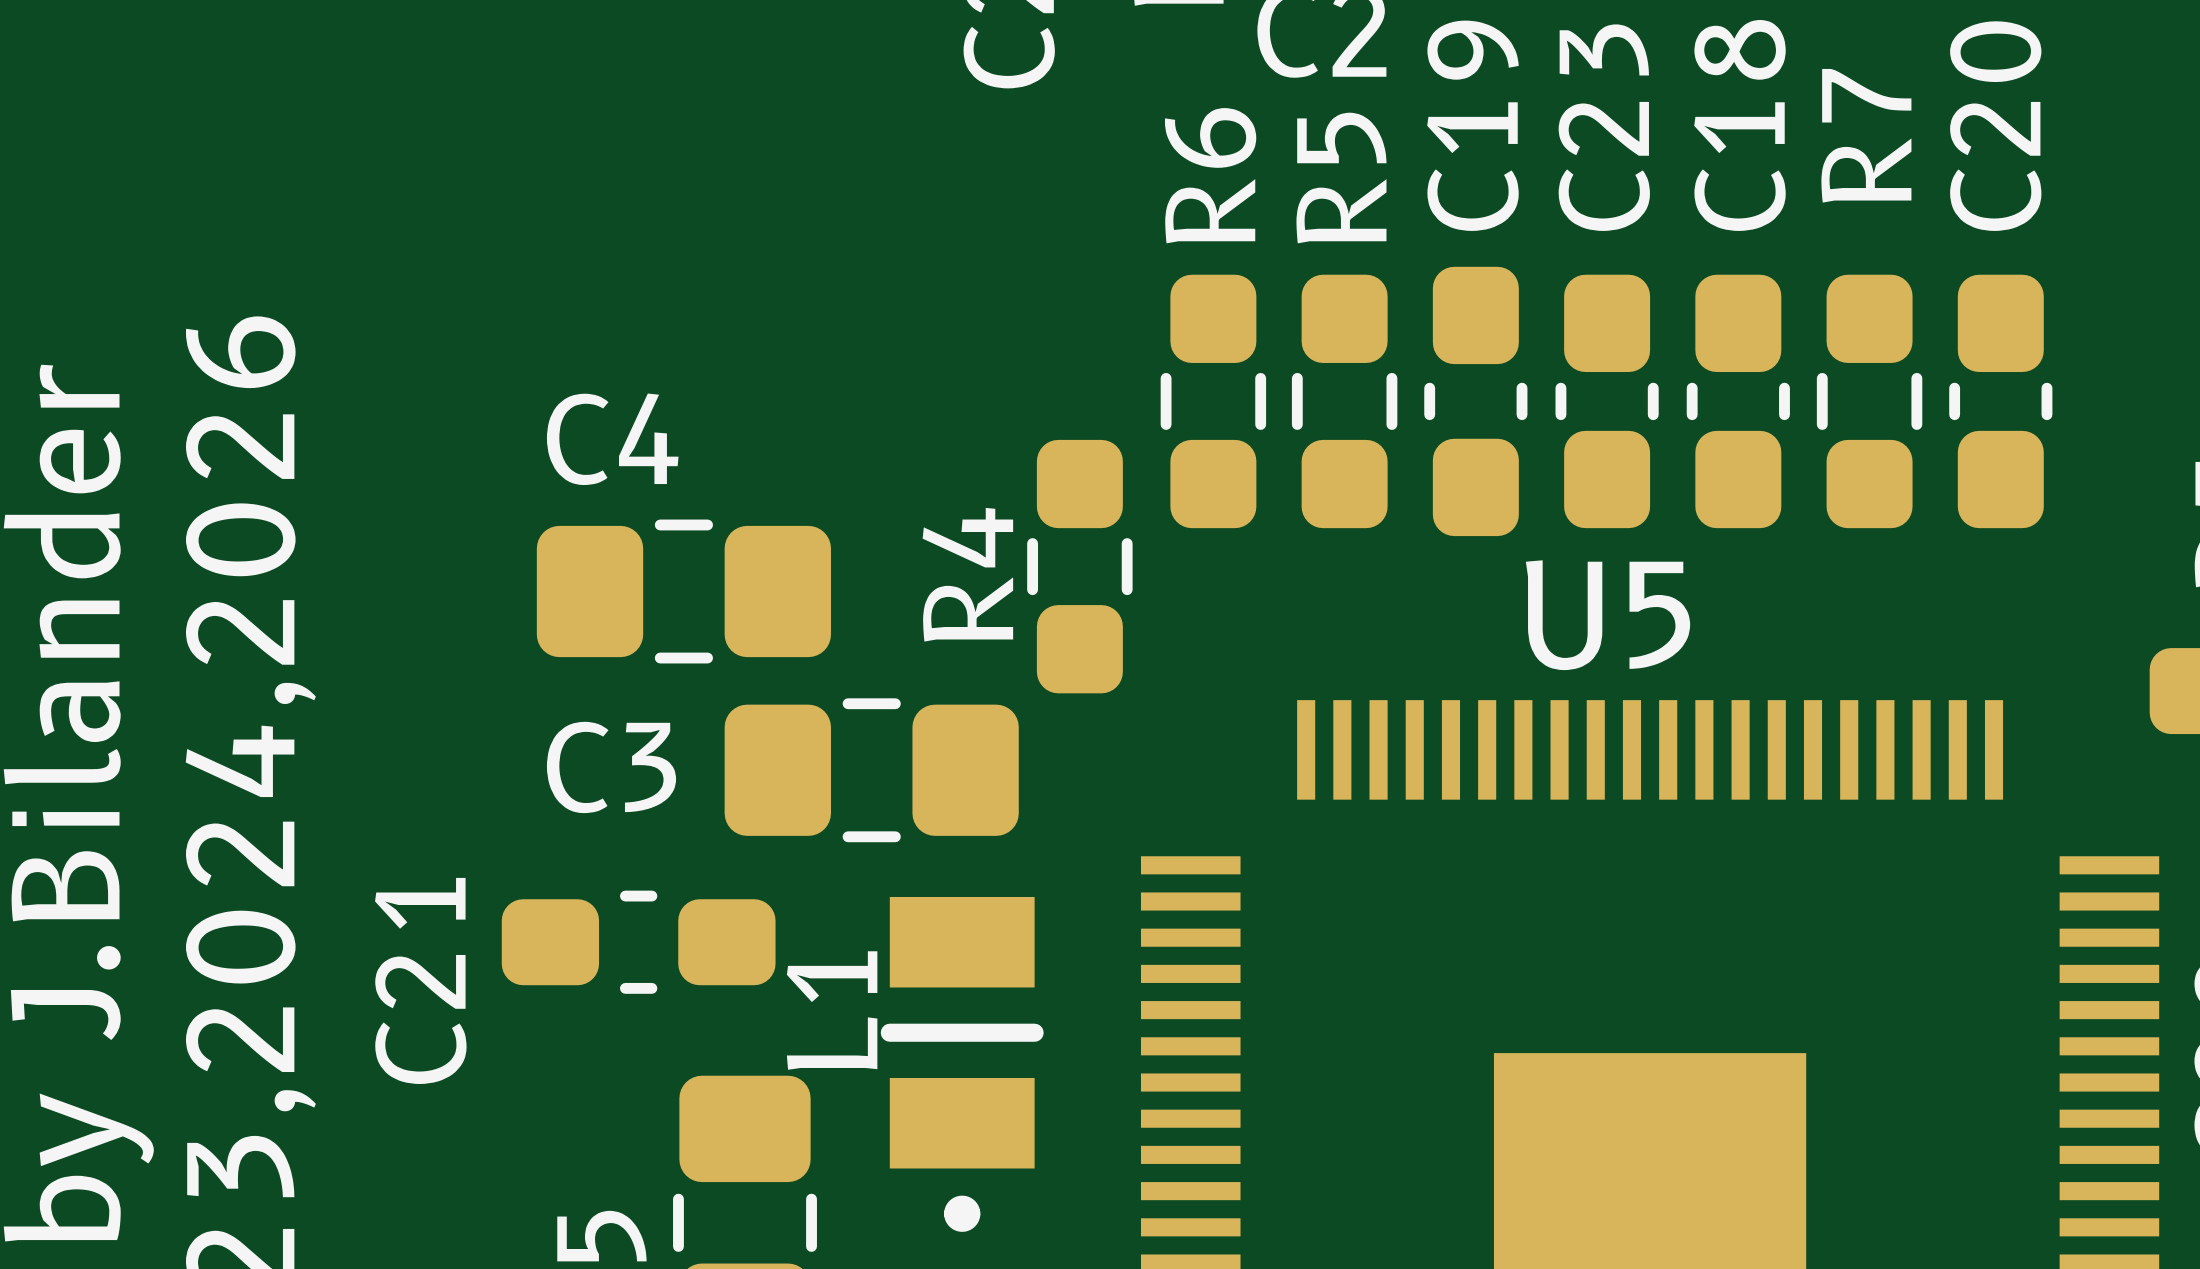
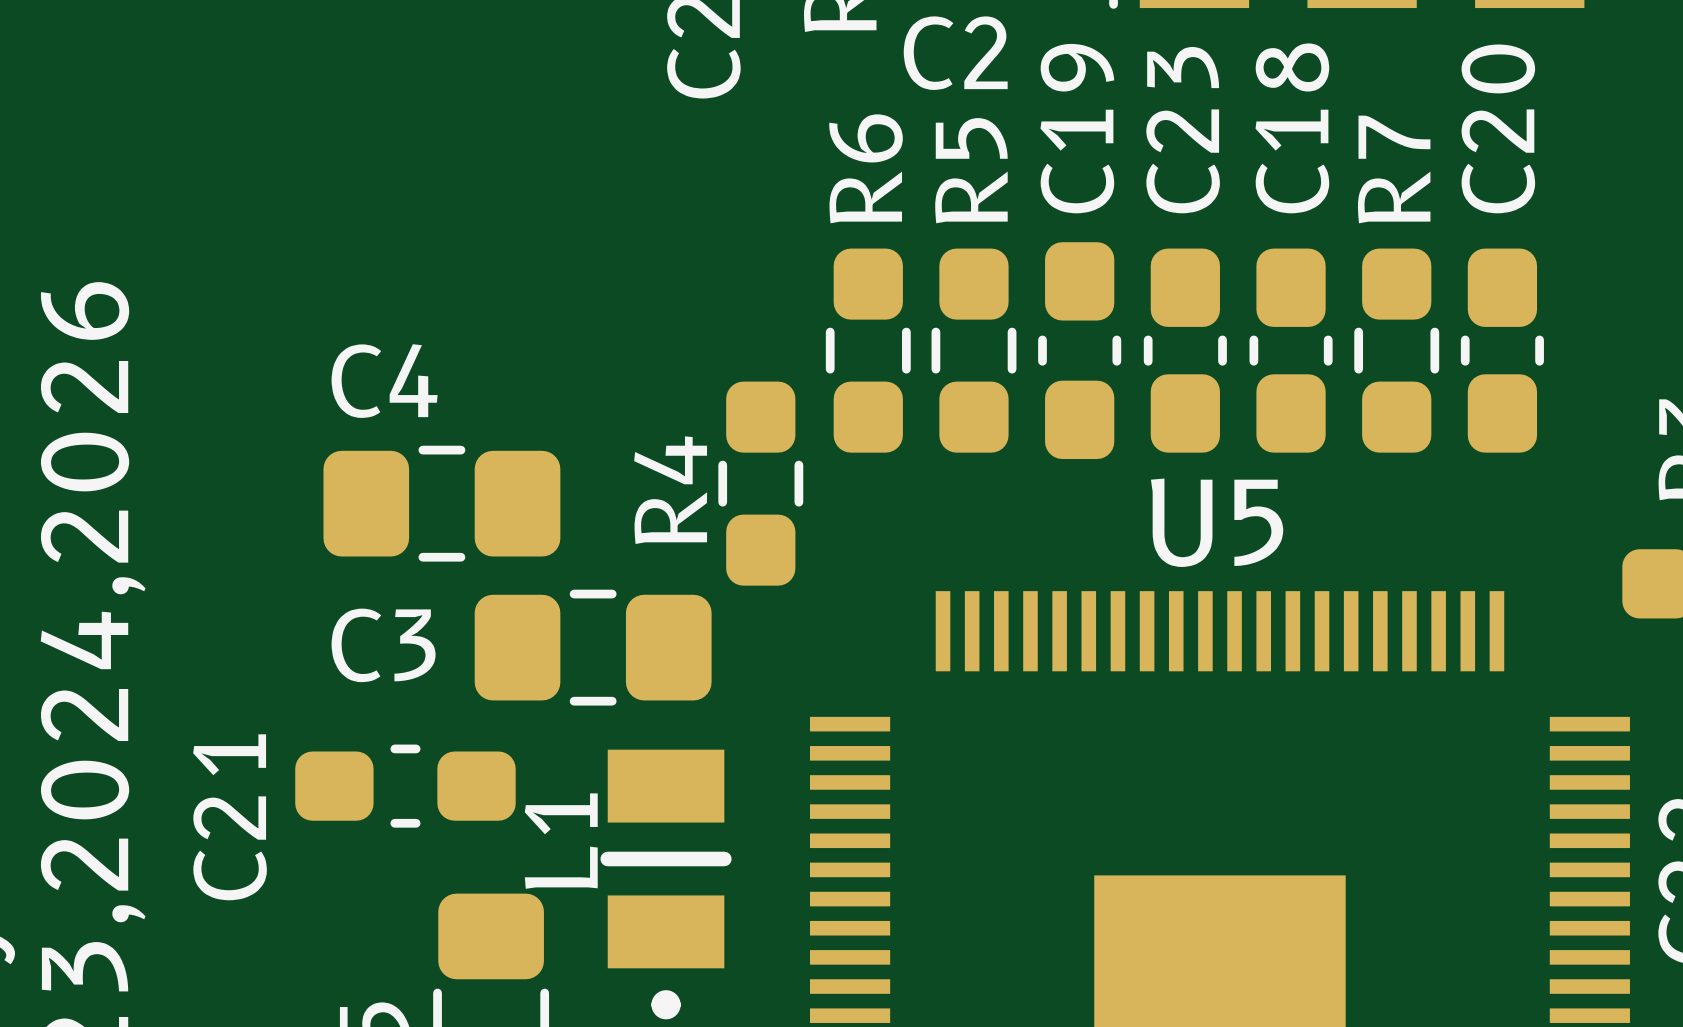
R7 name position: R7 (1866, 135) -> R7 (1394, 169)
U5 name position: U5 (1608, 615) -> U5 (1217, 522)

